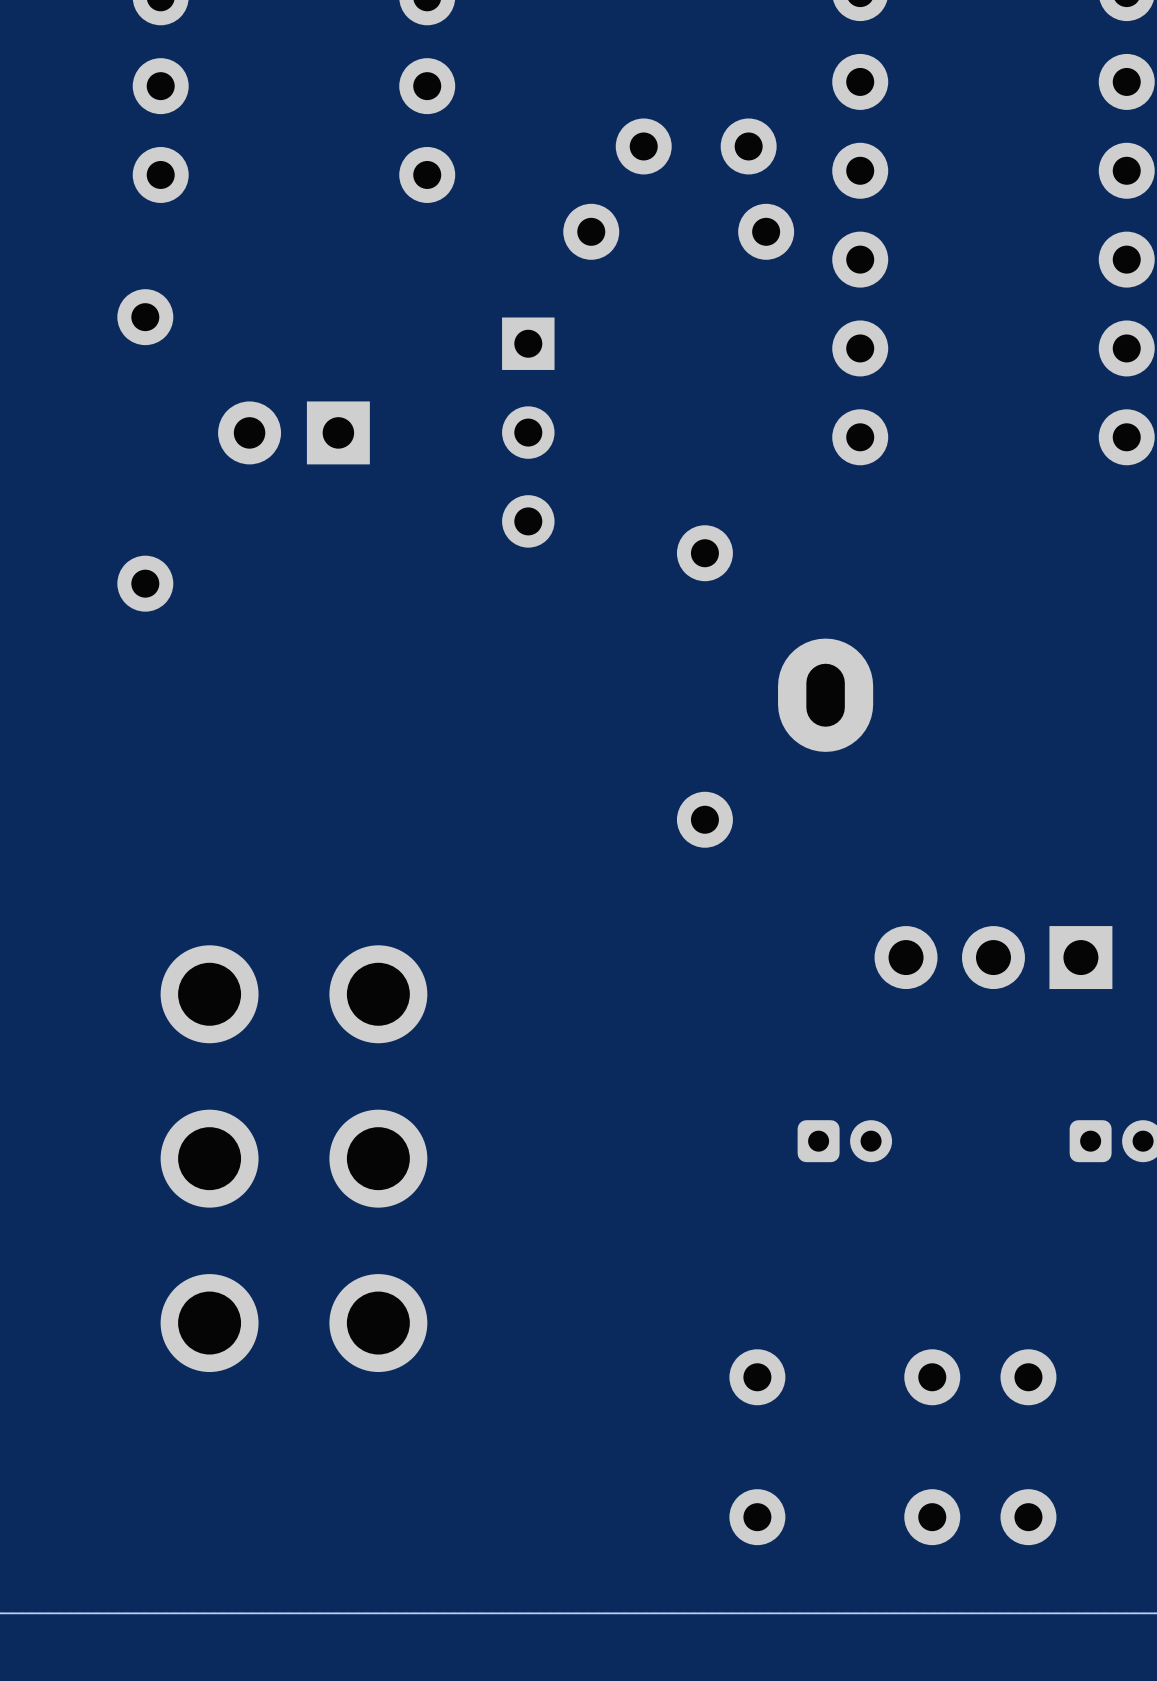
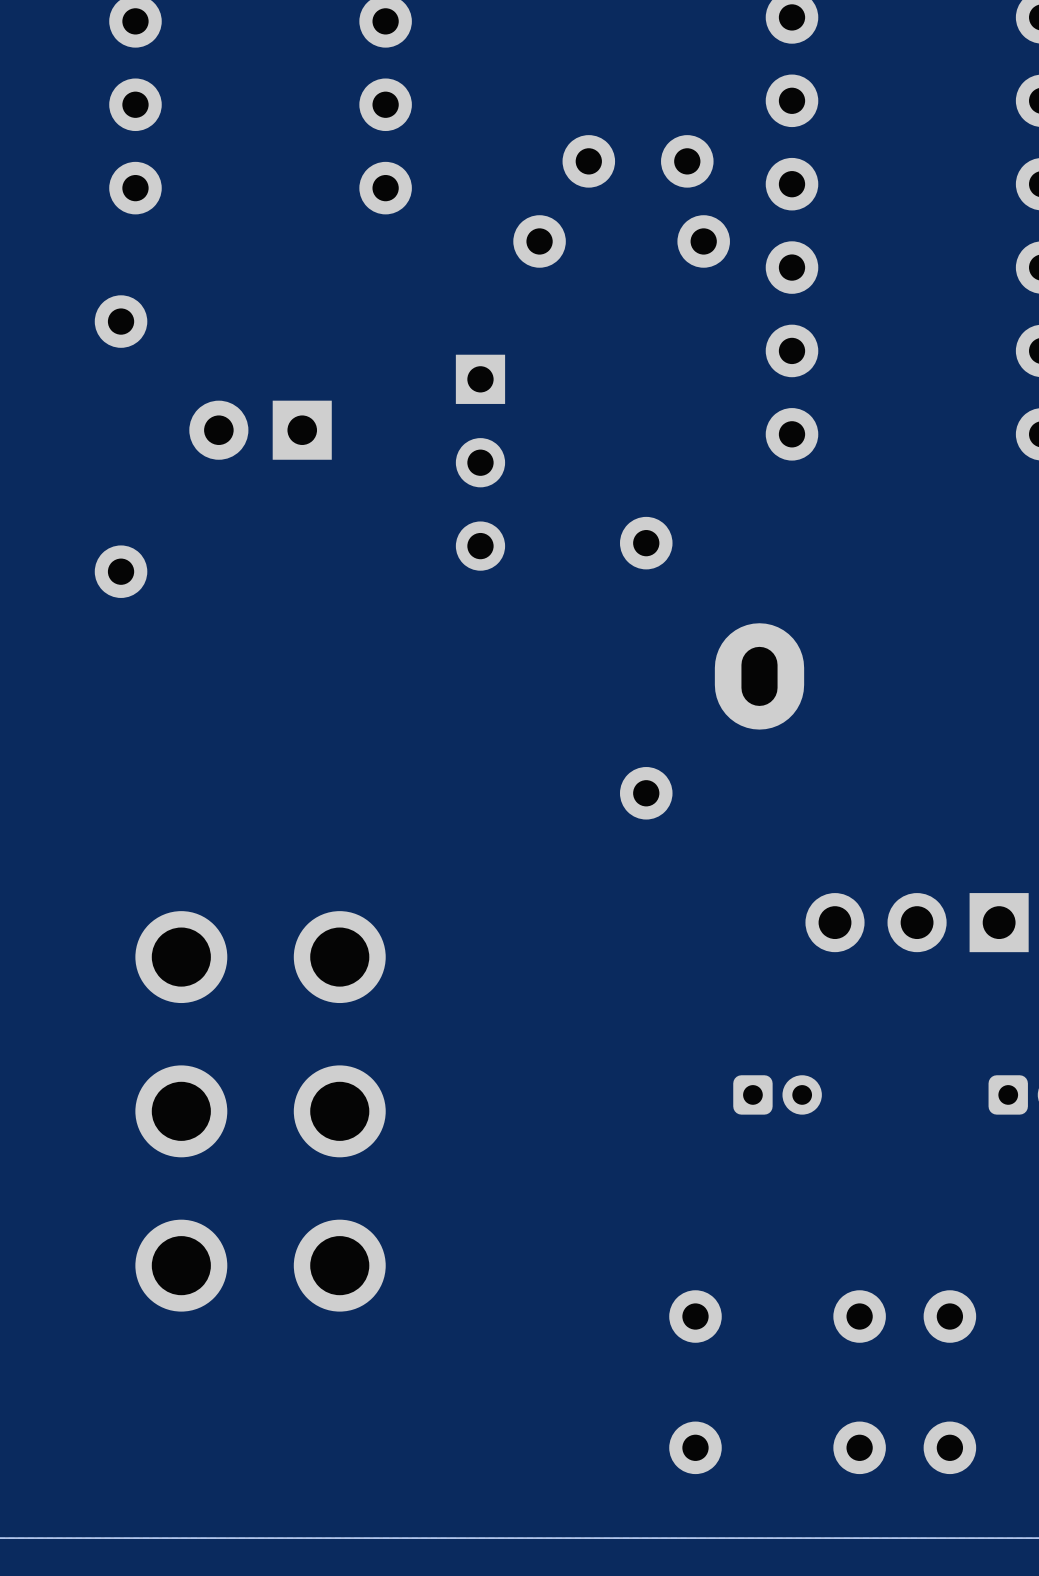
part position: (528, 432) -> (480, 462)

